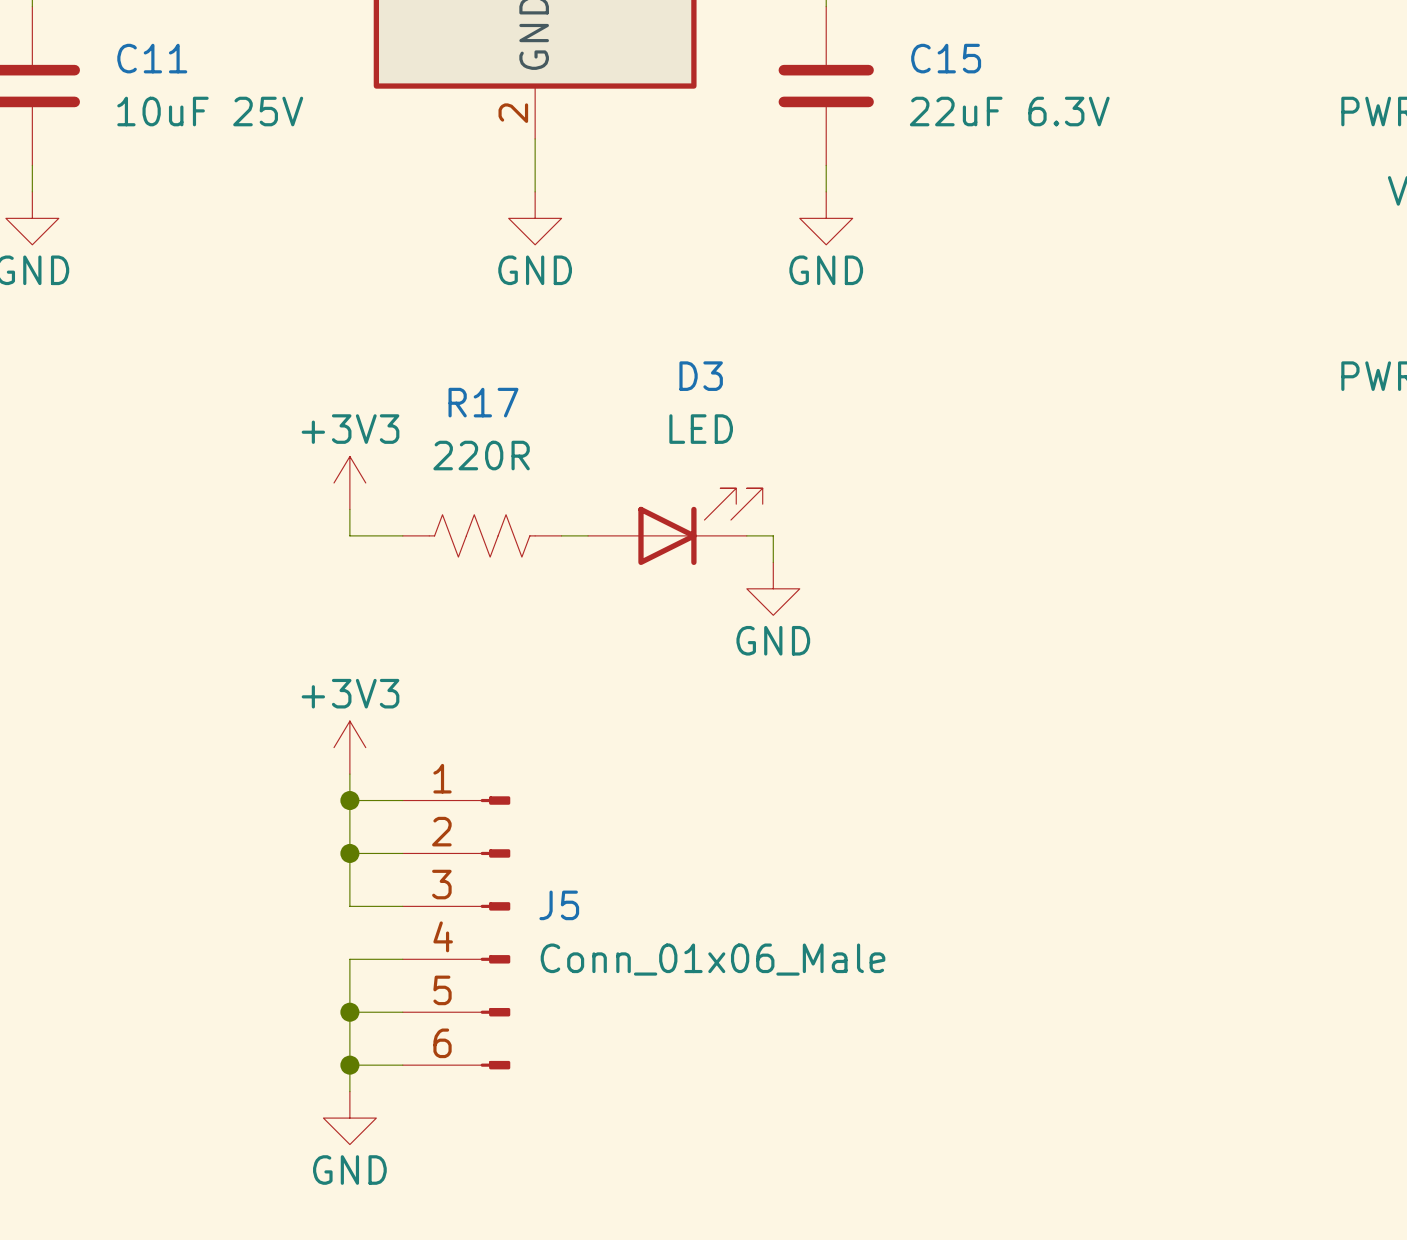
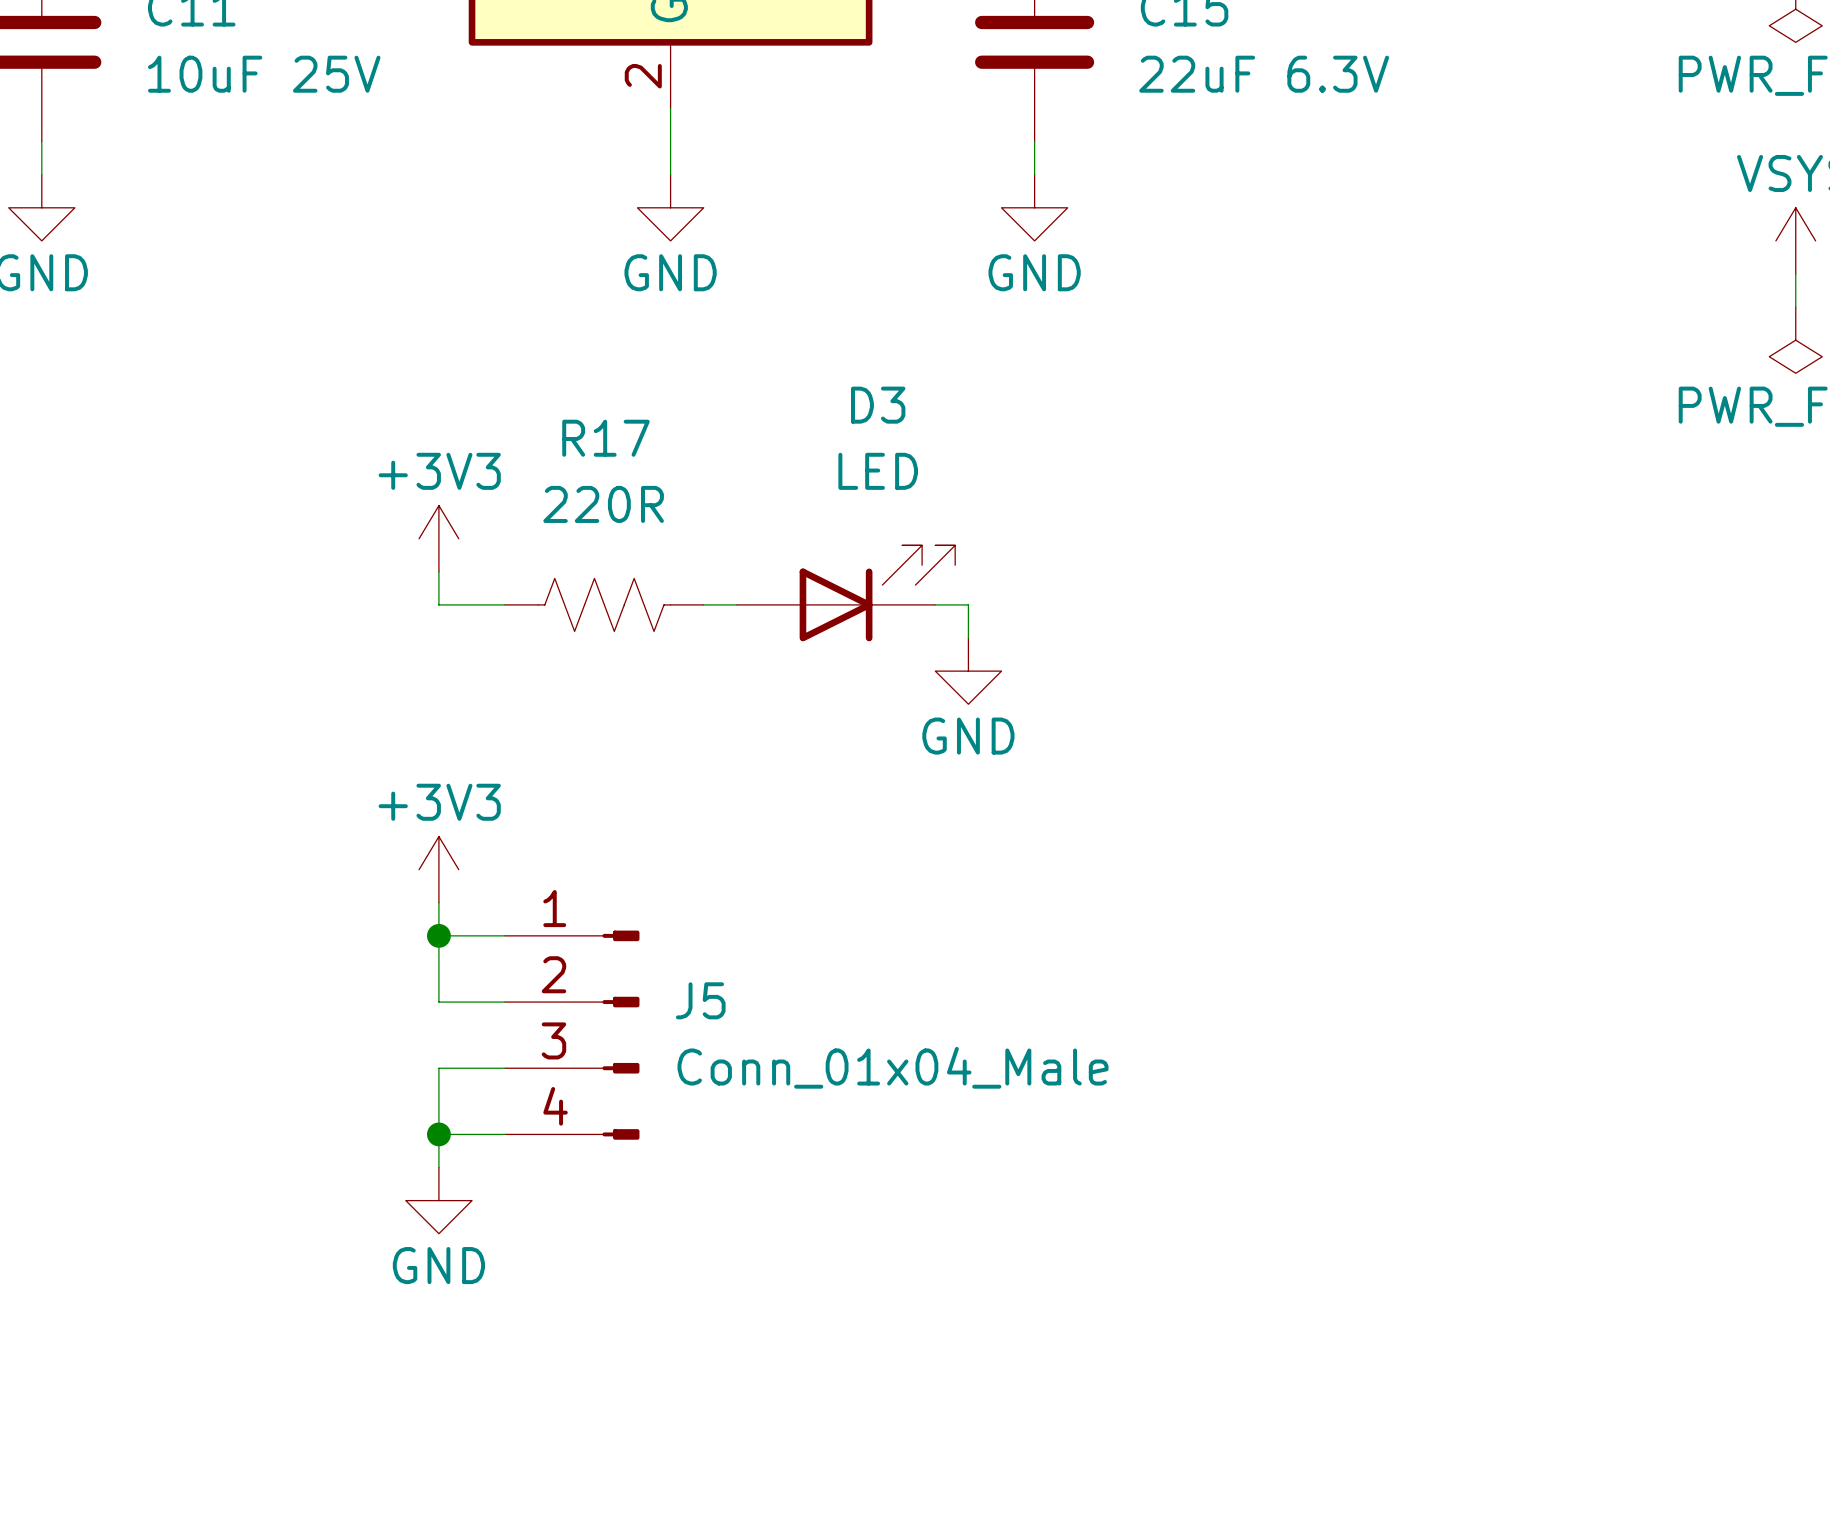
J5 symbol: [402, 796, 511, 1070] -> [505, 930, 640, 1140]
wire: (349, 853) (349, 906) -> (438, 1134) (438, 1068)
junction: (349, 853) -> none
junction: none -> (438, 1134)
J5 value: Conn_01x06_Male (713, 959) -> Conn_01x04_Male (893, 1067)
wire: (349, 985) (349, 1091) -> none
wire: (349, 1012) (402, 1012) -> none
junction: (349, 1012) -> none
wire: (349, 1065) (402, 1065) -> none
junction: (349, 1065) -> none
power symbol position: GND (349, 1118) -> GND (438, 1200)

